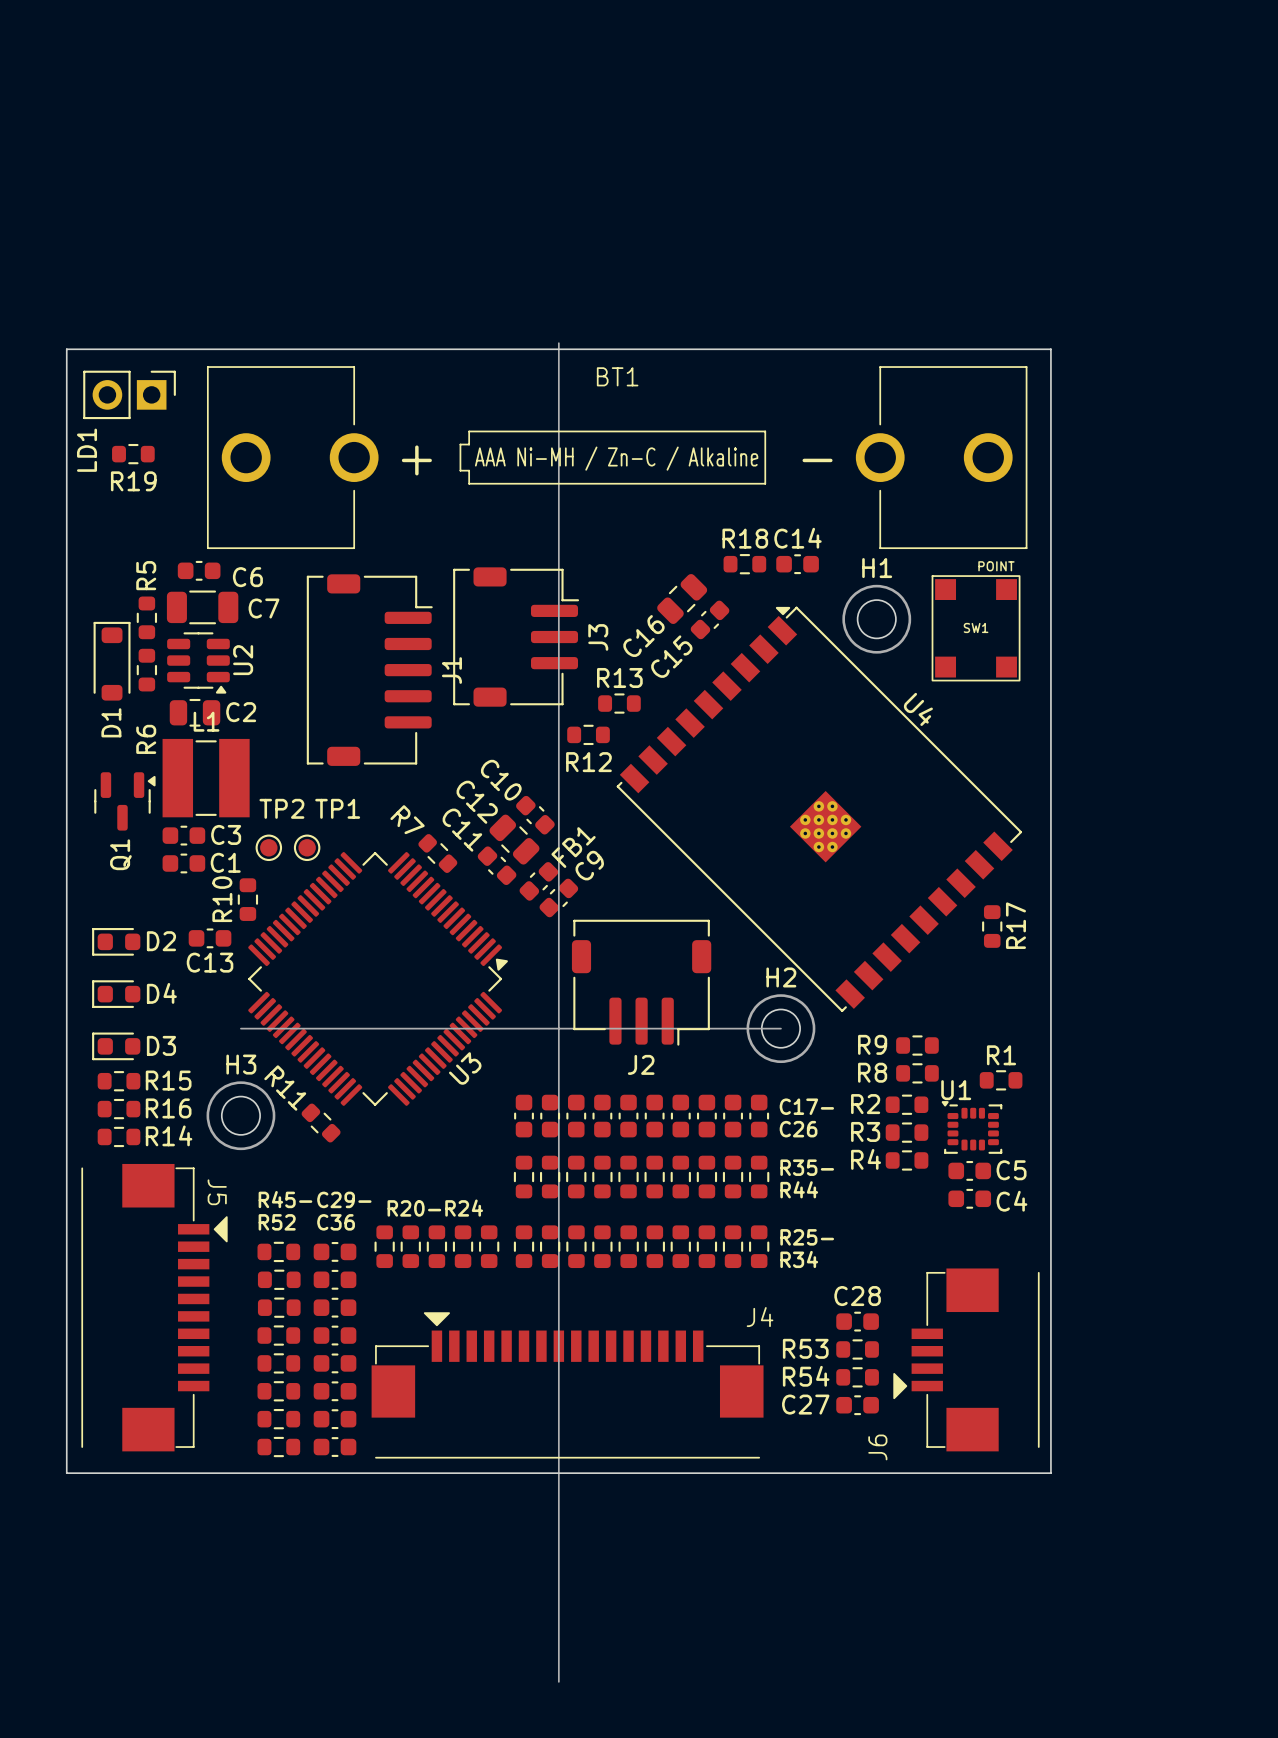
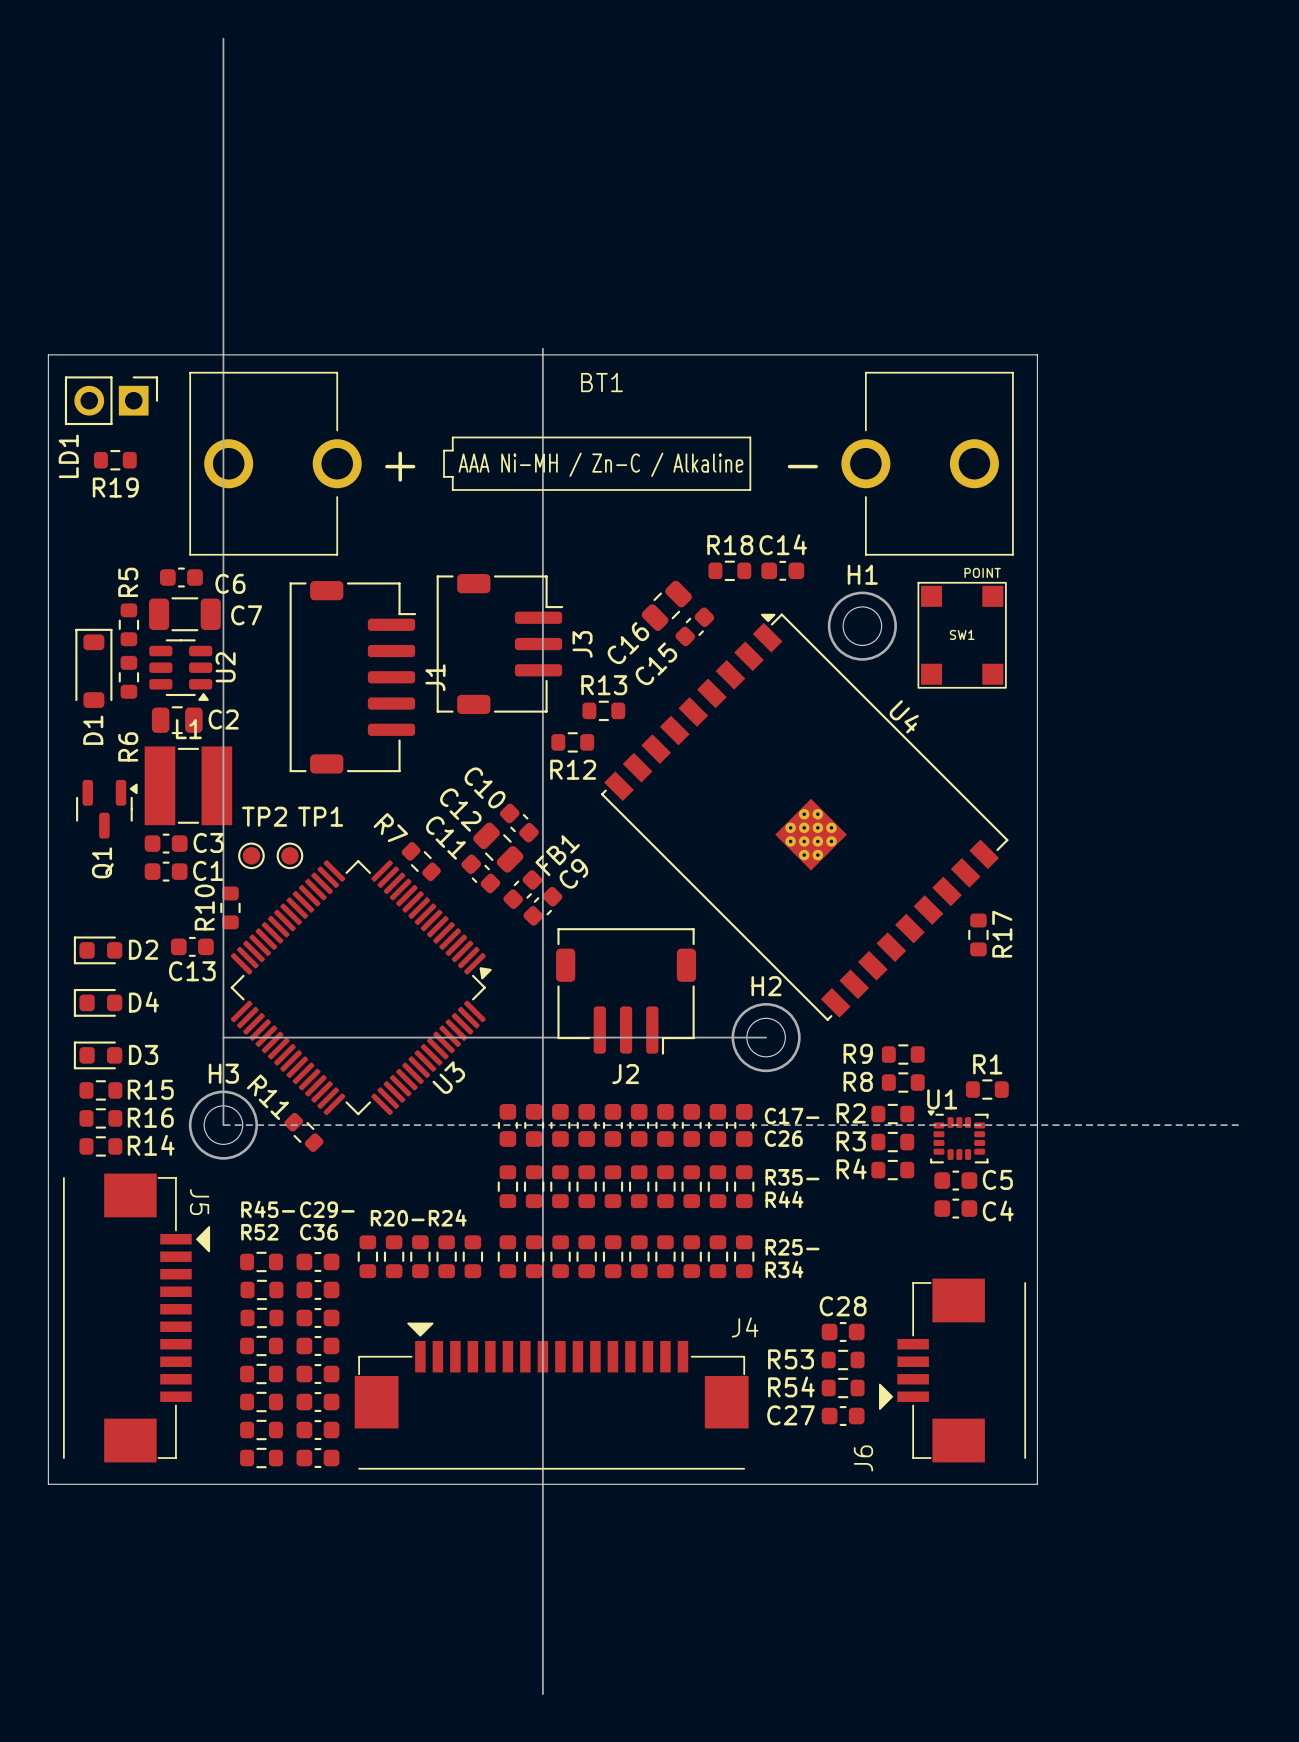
line: none -> (223, 38) (223, 1125) (1240, 1125)

